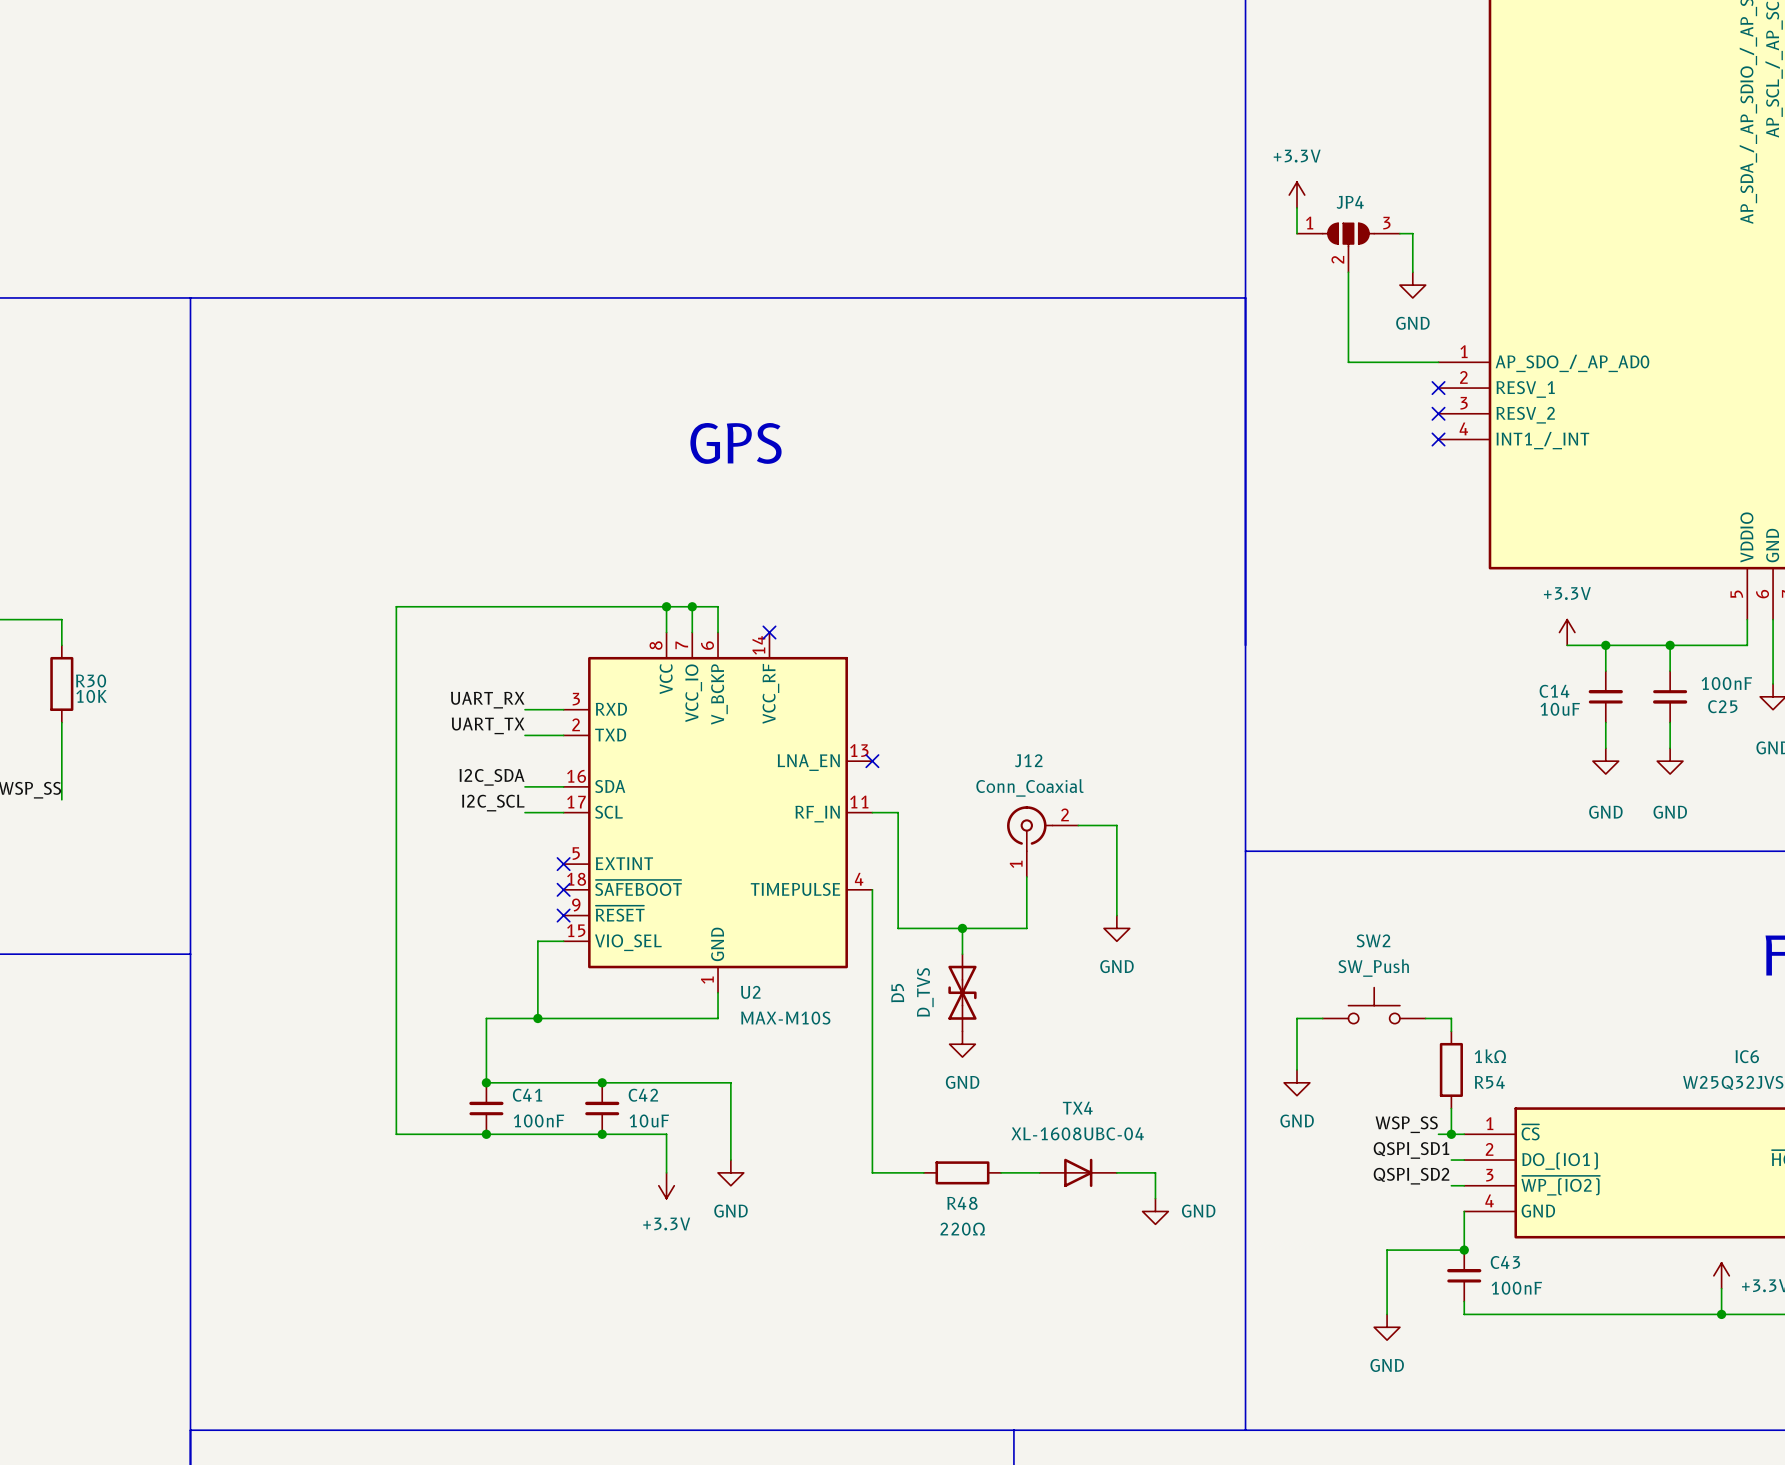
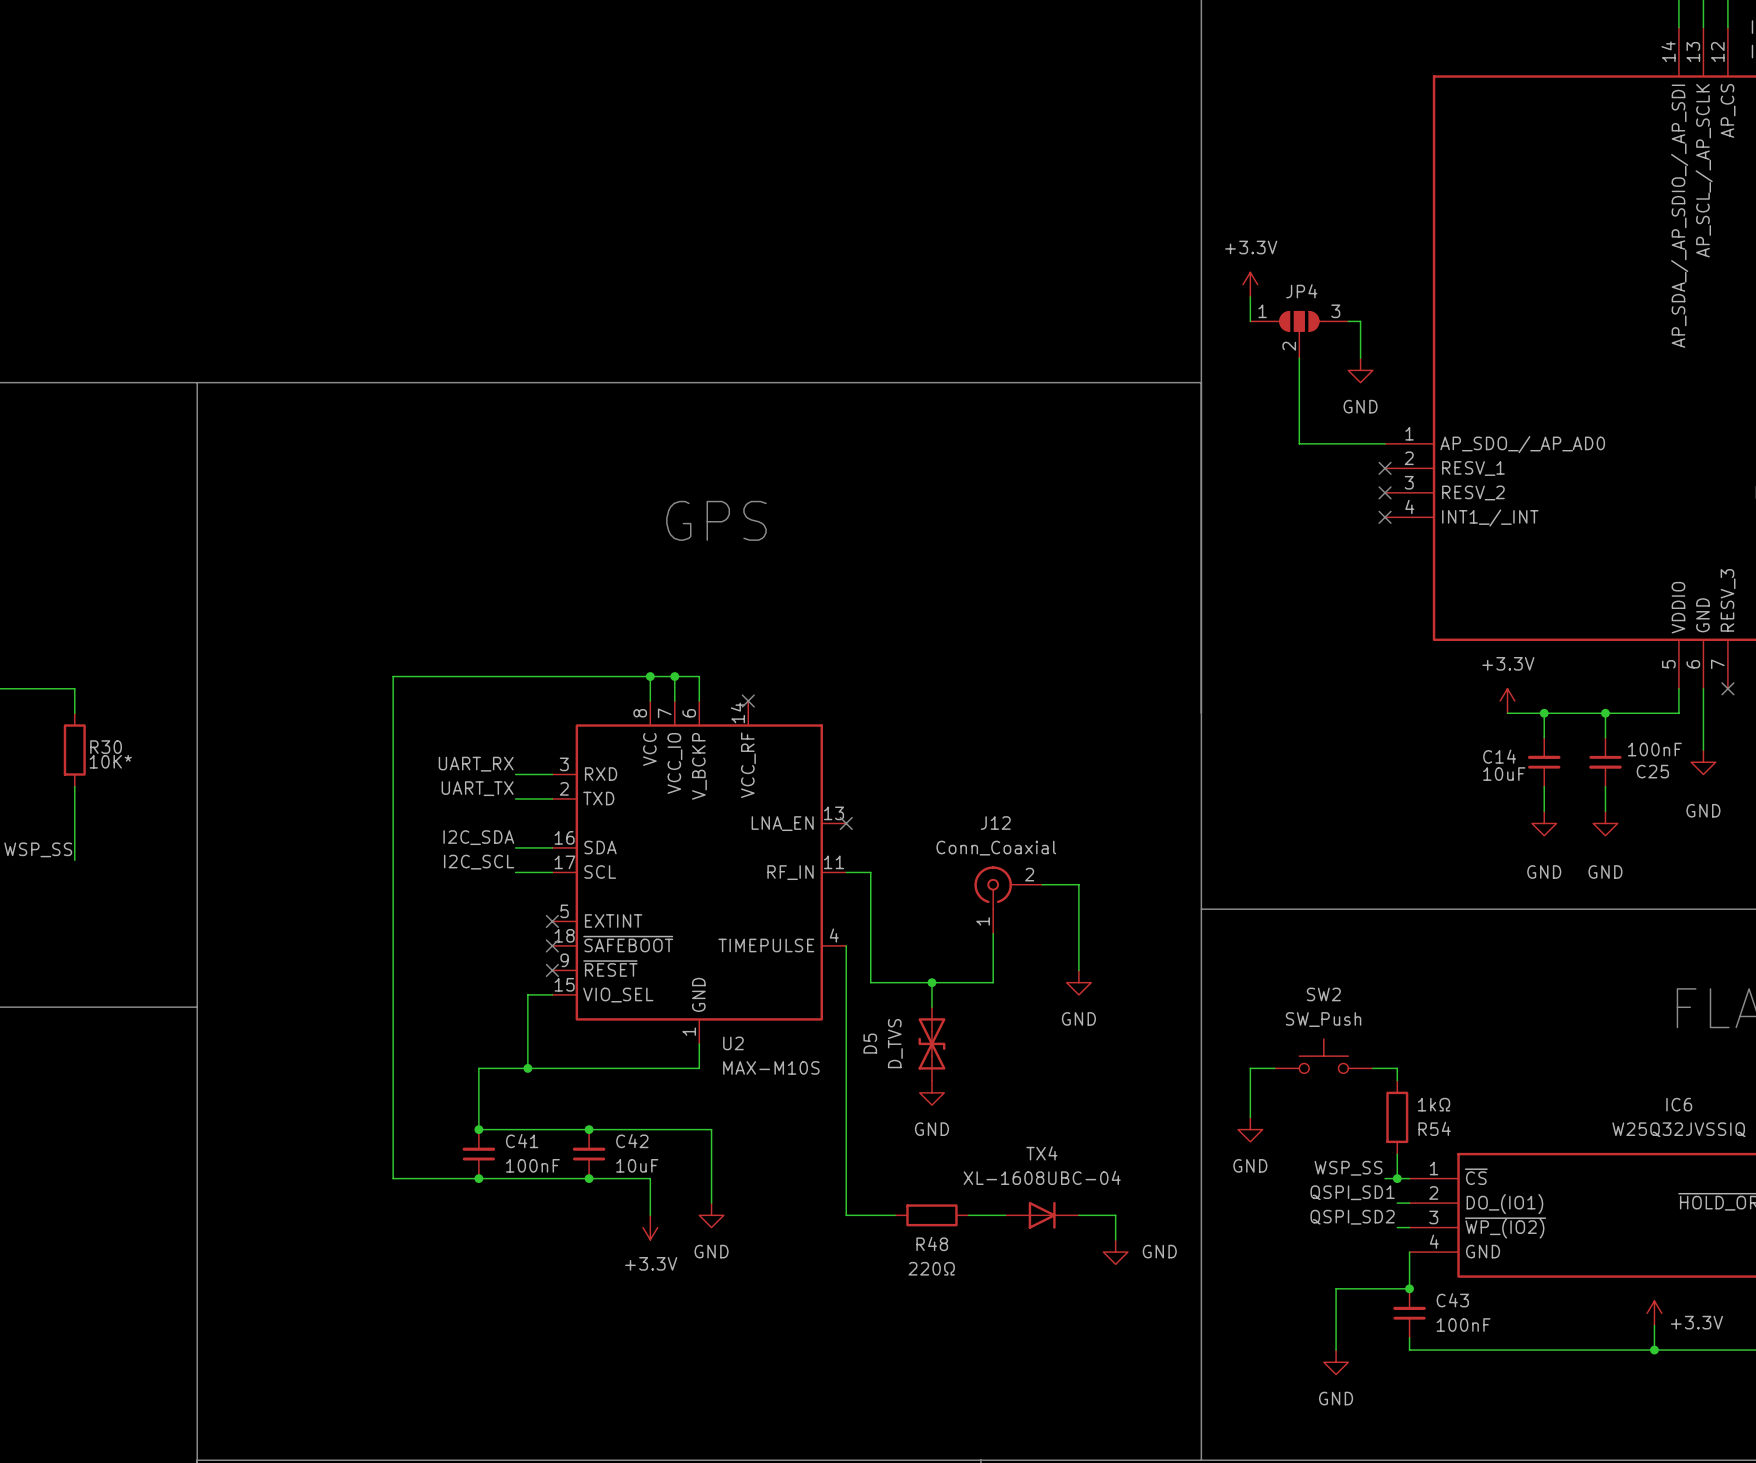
R30 value: 10K (91, 696) -> 10K* (110, 761)

